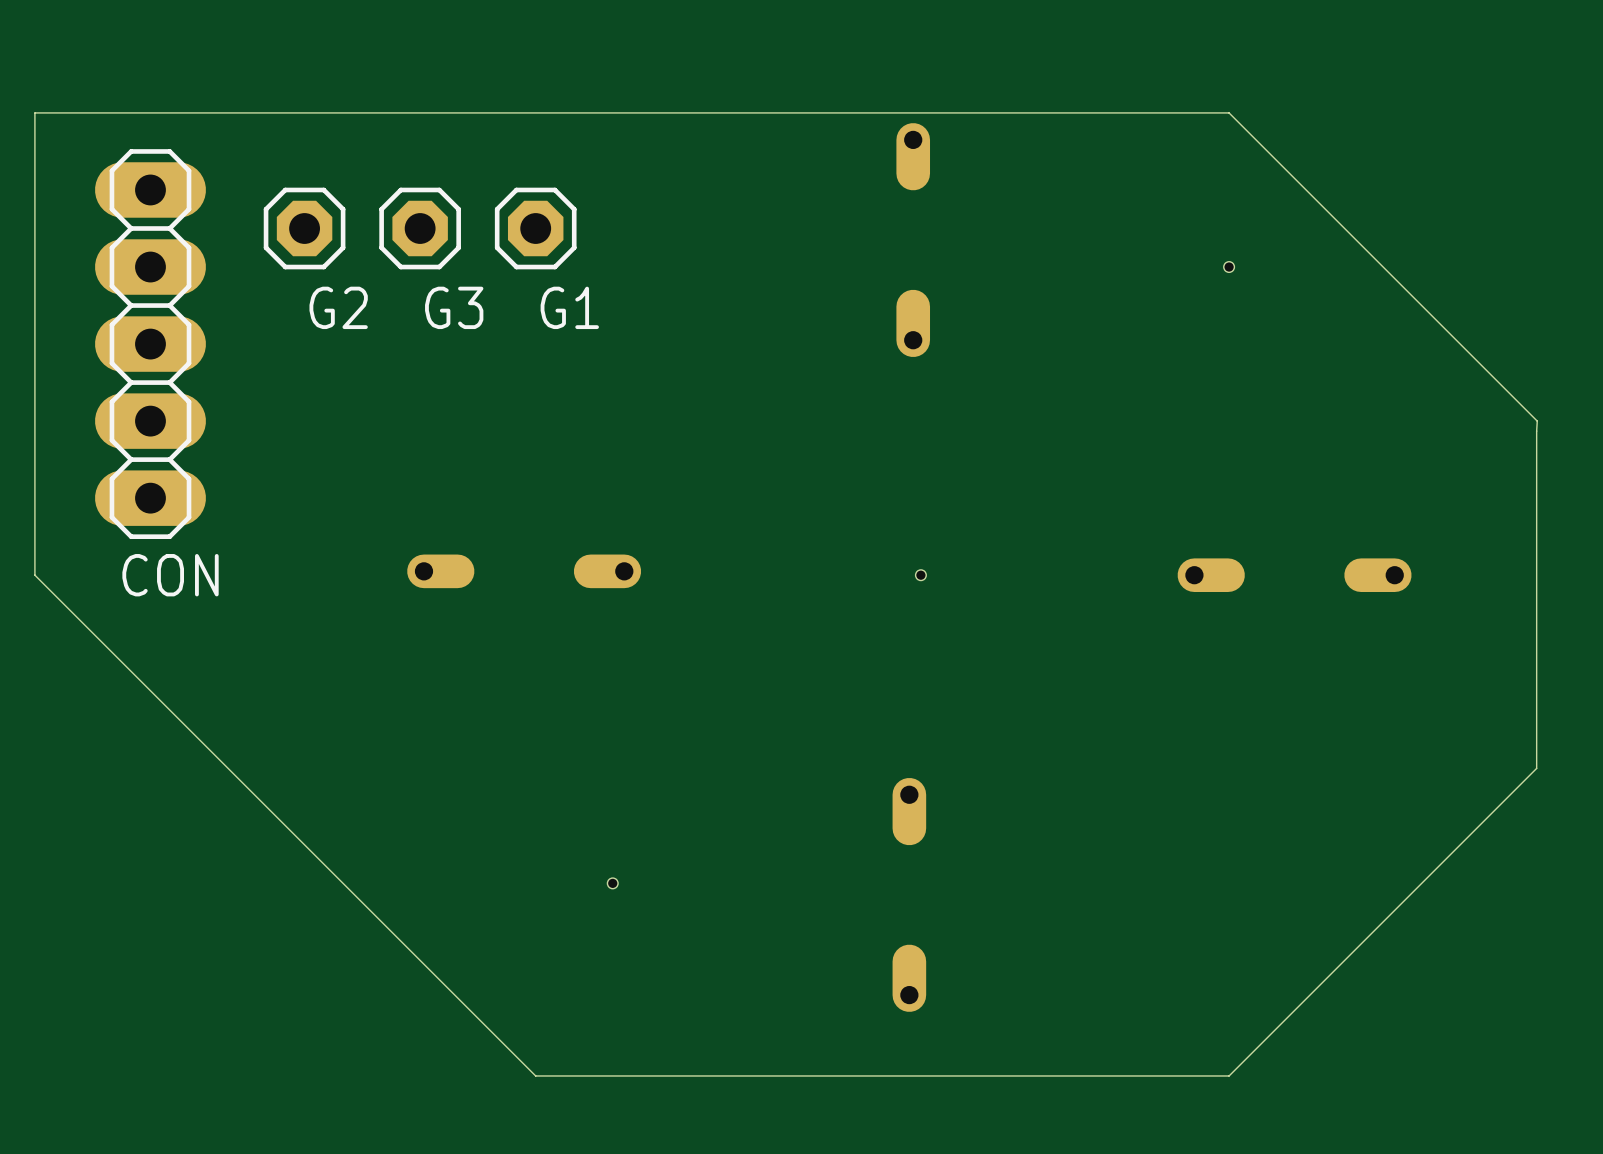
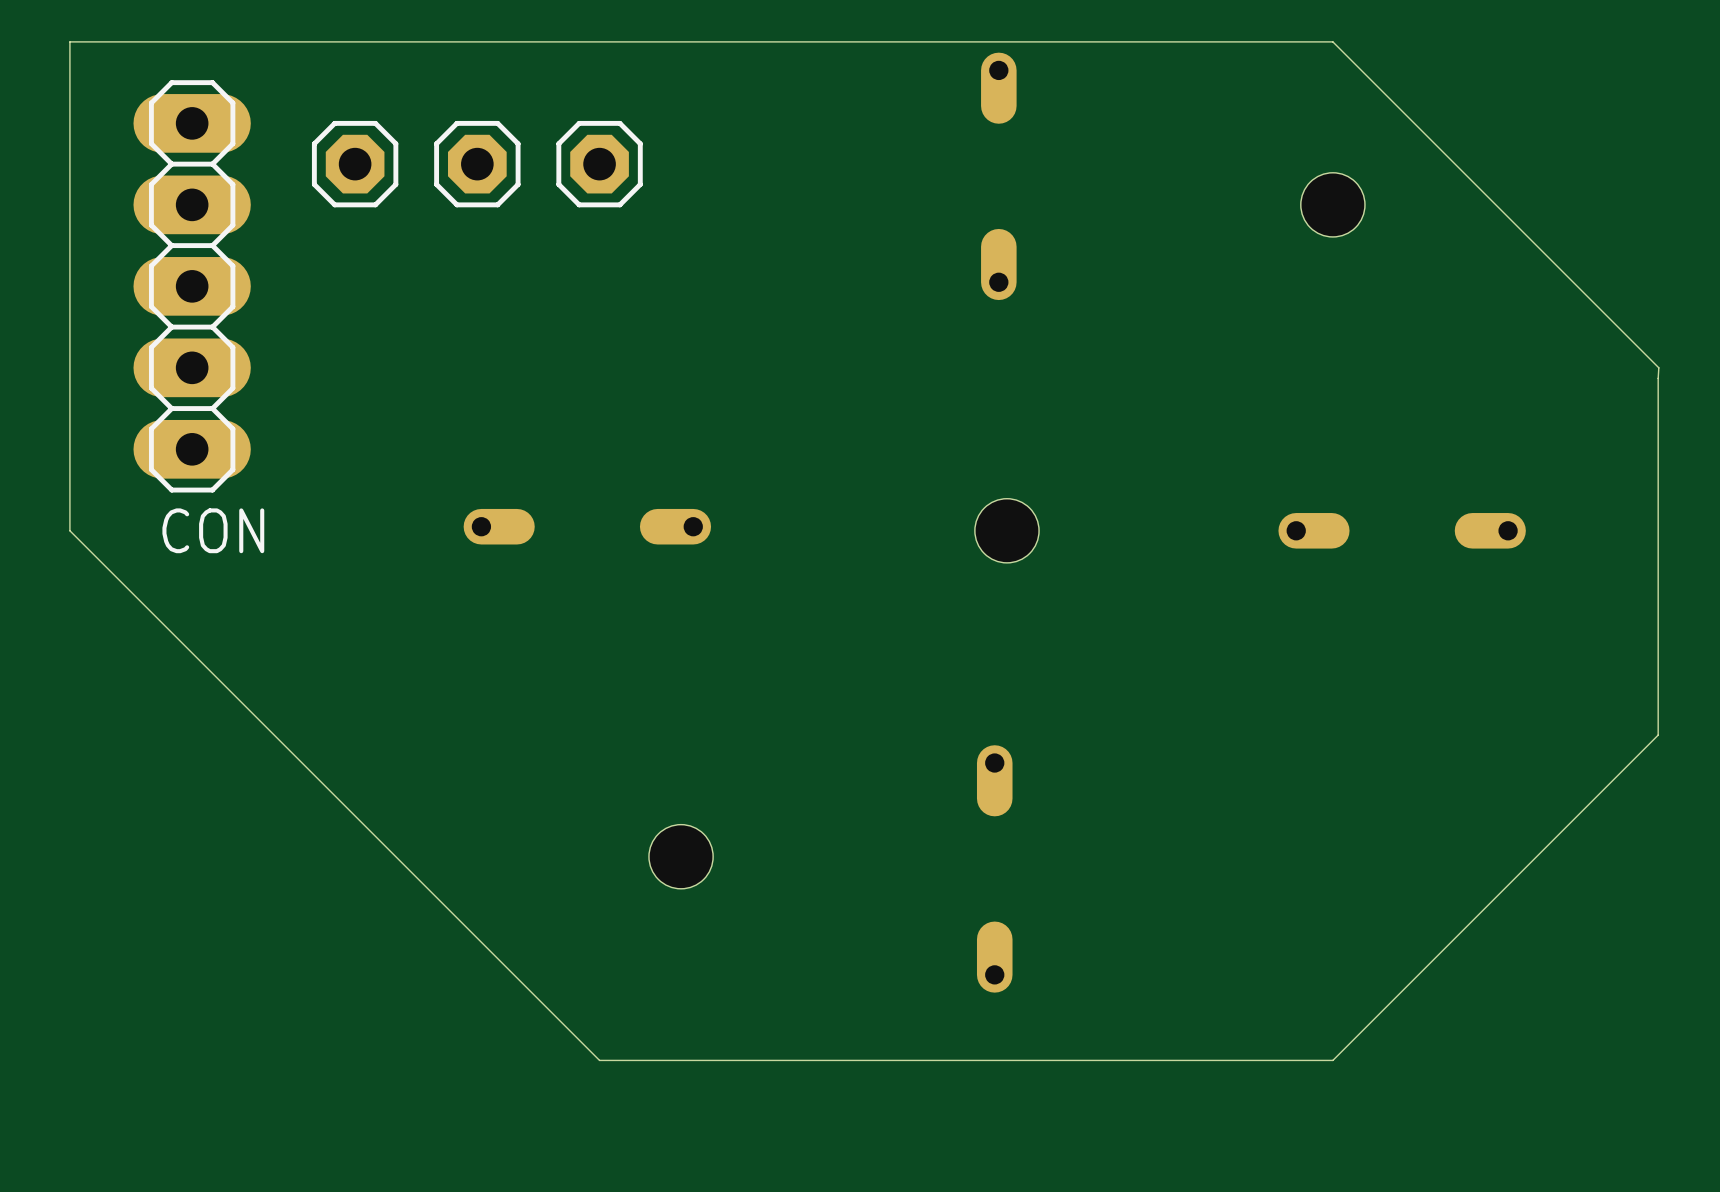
hole size: [1223, 261, 1235, 273] -> [1300, 172, 1365, 237]
G2 name: G2 (338, 307) -> none
G3 name: G3 (454, 307) -> none
G1 name: G1 (569, 307) -> none
hole size: [915, 569, 927, 581] -> [974, 498, 1040, 563]
hole size: [607, 878, 619, 889] -> [648, 824, 714, 889]

